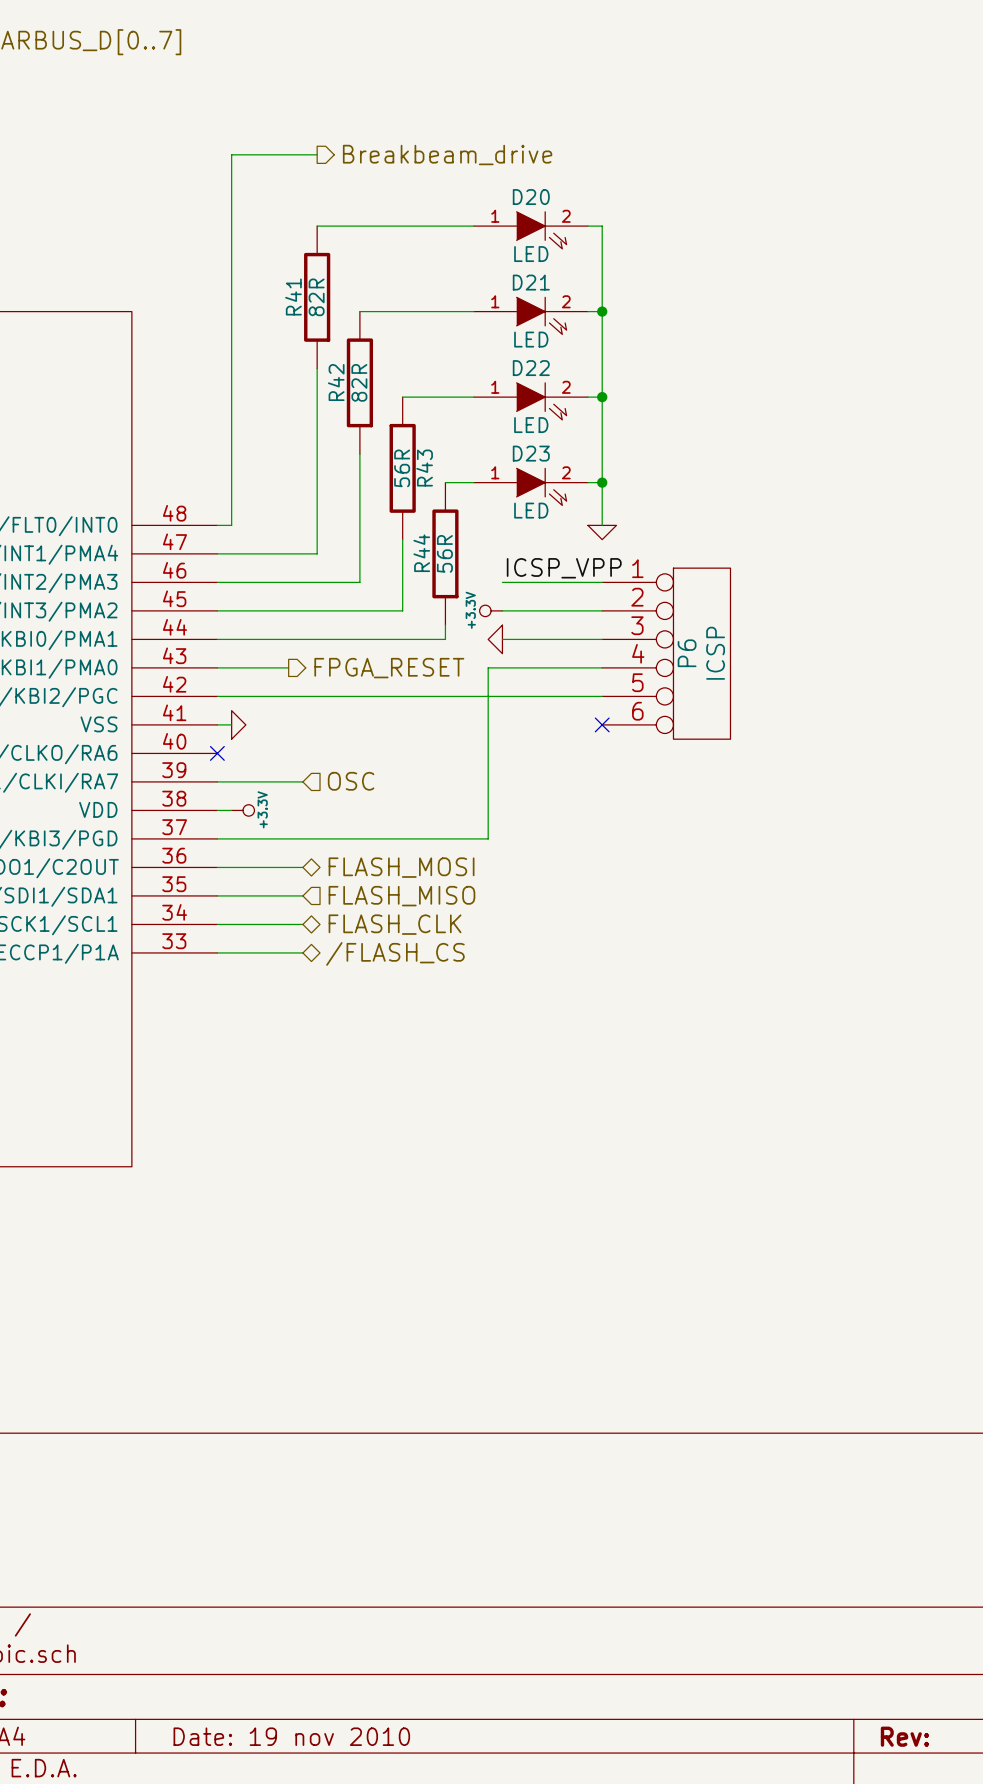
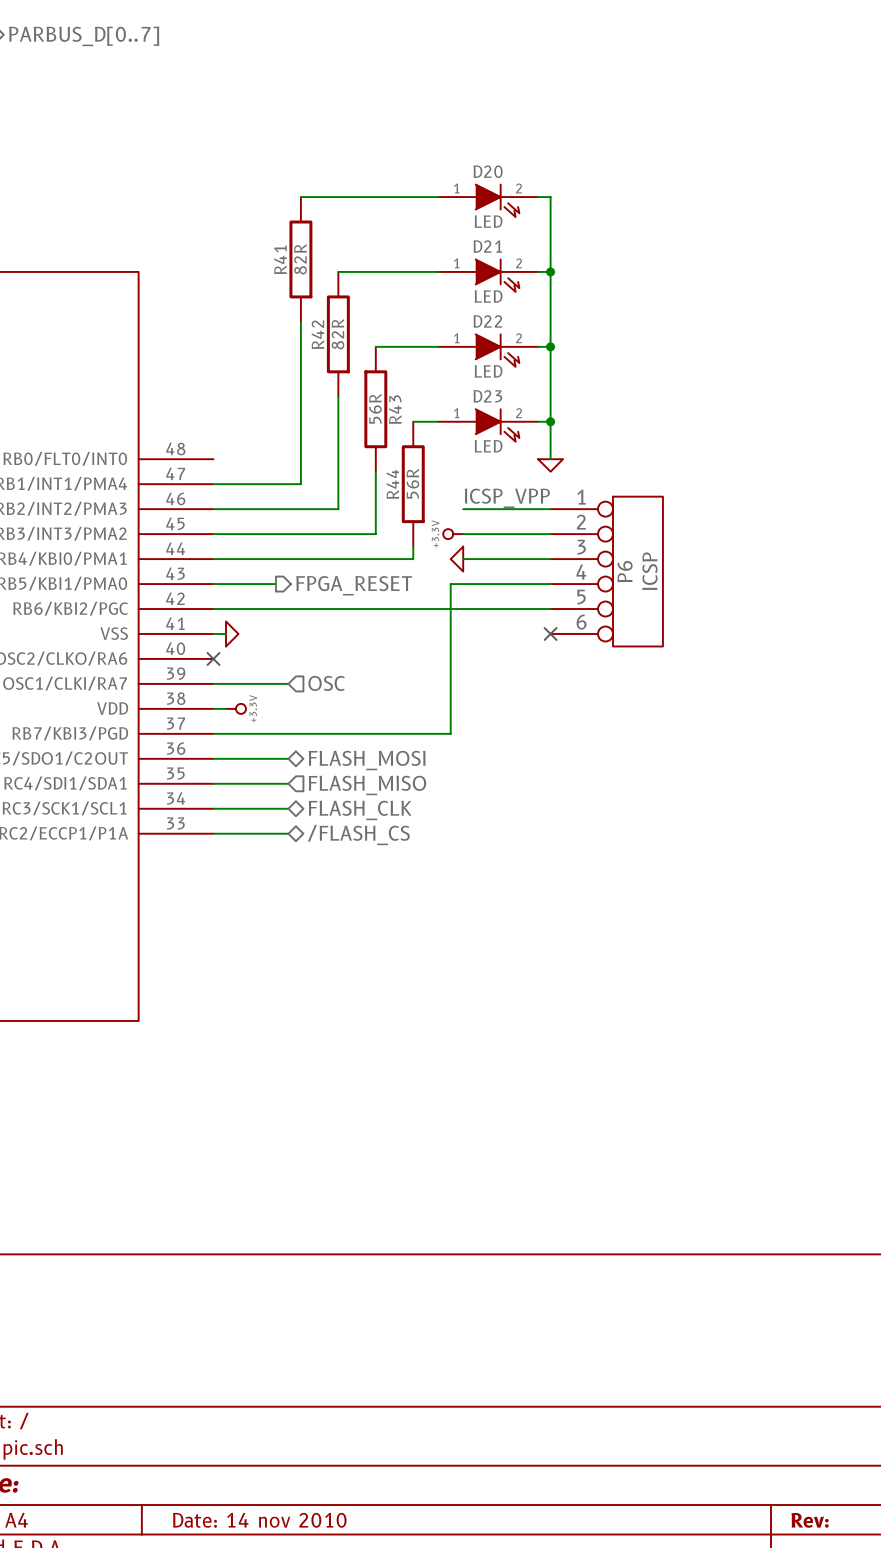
wire: (317, 154) (231, 154) (231, 525) (217, 525) -> none
hierarchical label: Breakbeam_drive (447, 155) -> none
title block: Date: 19 nov 2010 (291, 1736) -> Date: 14 nov 2010 (259, 1520)

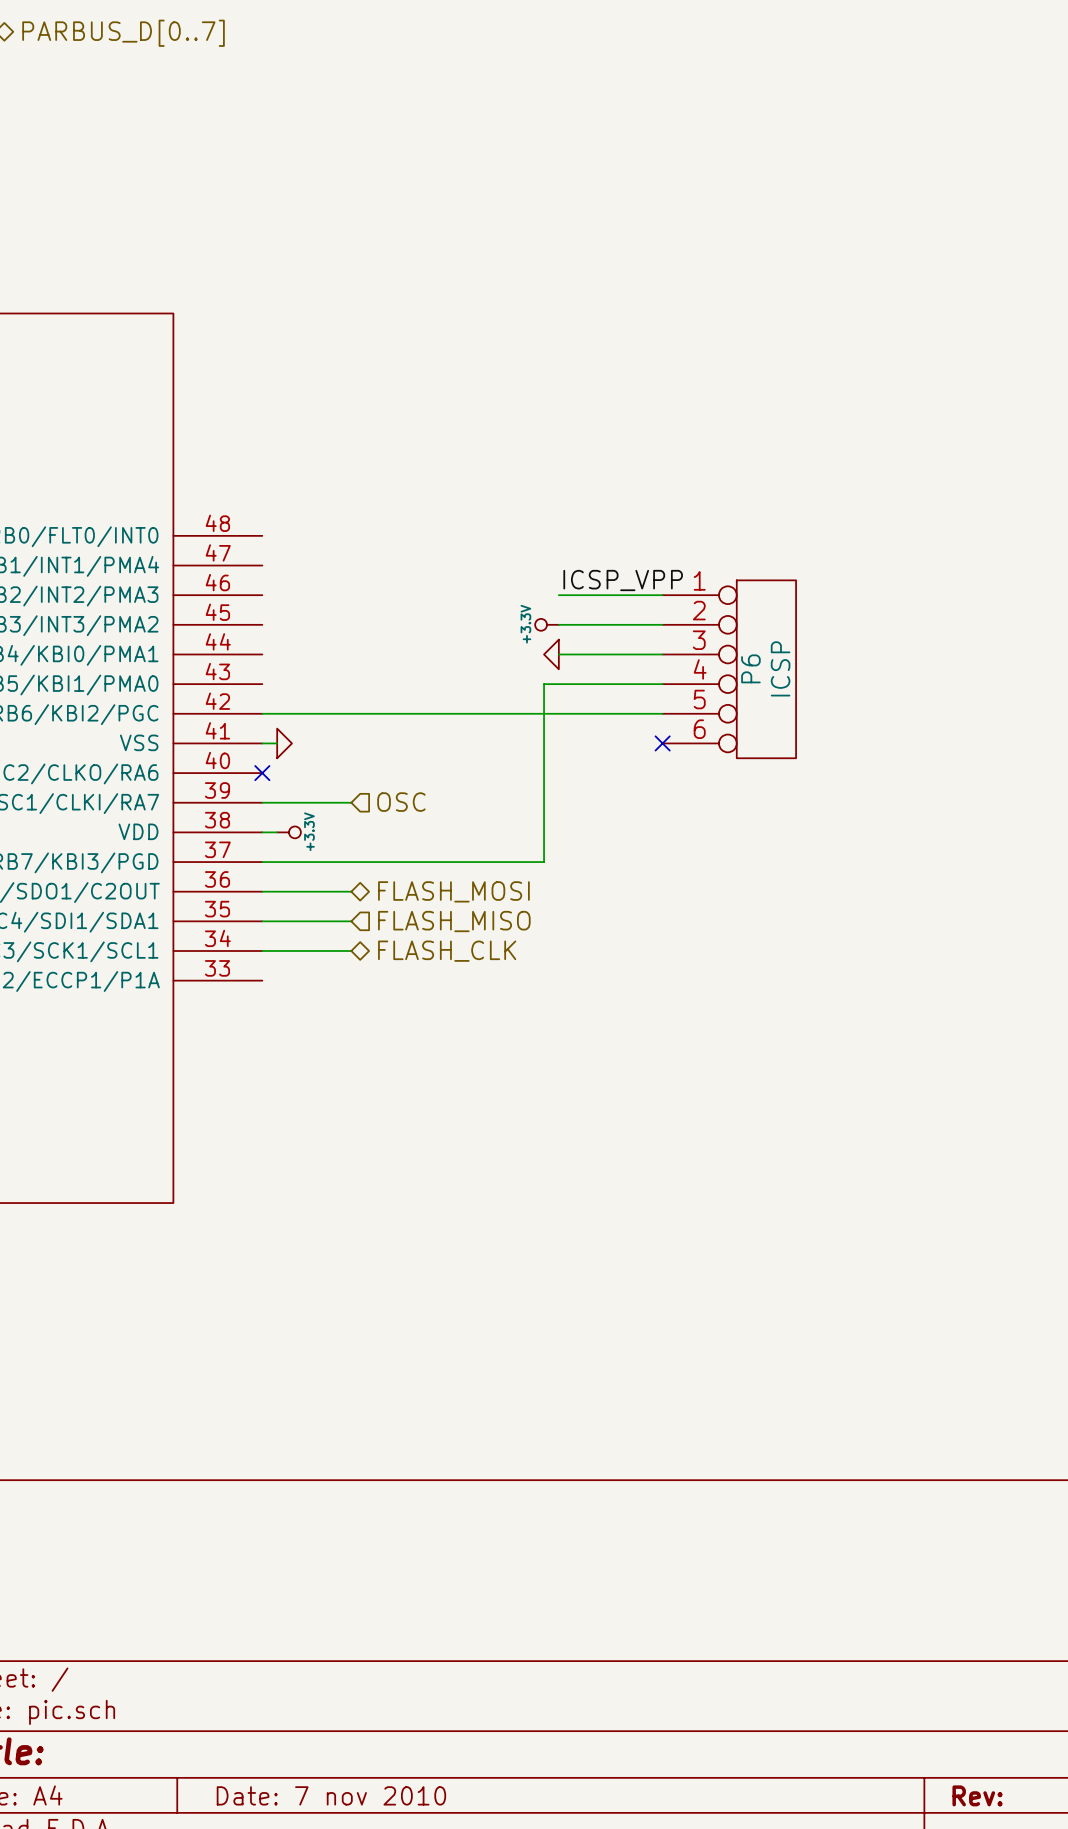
wire: (300, 197) (438, 197) -> none
wire: (538, 197) (550, 197) (550, 459) -> none
D20: LED (488, 200) -> none
R41: 82R (300, 259) -> none
wire: (338, 271) (438, 271) -> none
wire: (538, 271) (550, 271) -> none
junction: (550, 271) -> none
D21: LED (488, 275) -> none
wire: (300, 321) (300, 484) (213, 484) -> none
R42: 82R (338, 334) -> none
wire: (375, 346) (438, 346) -> none
wire: (538, 346) (550, 346) -> none
junction: (550, 346) -> none
D22: LED (488, 350) -> none
wire: (338, 396) (338, 509) (213, 509) -> none
R43: 56R (375, 409) -> none
wire: (413, 421) (438, 421) -> none
wire: (538, 421) (550, 421) -> none
junction: (550, 421) -> none
D23: LED (488, 425) -> none
power symbol: (550, 465) -> none
wire: (375, 471) (375, 534) (213, 534) -> none
R44: 56R (413, 484) -> none
wire: (413, 546) (413, 559) (213, 559) -> none
wire: (213, 584) (275, 584) -> none
hierarchical label: FPGA_RESET (354, 585) -> none
wire: (213, 833) (288, 833) -> none
hierarchical label: /FLASH_CS (358, 835) -> none
title block: Date: 14 nov 2010 (259, 1520) -> Date: 7 nov 2010 (331, 1795)

